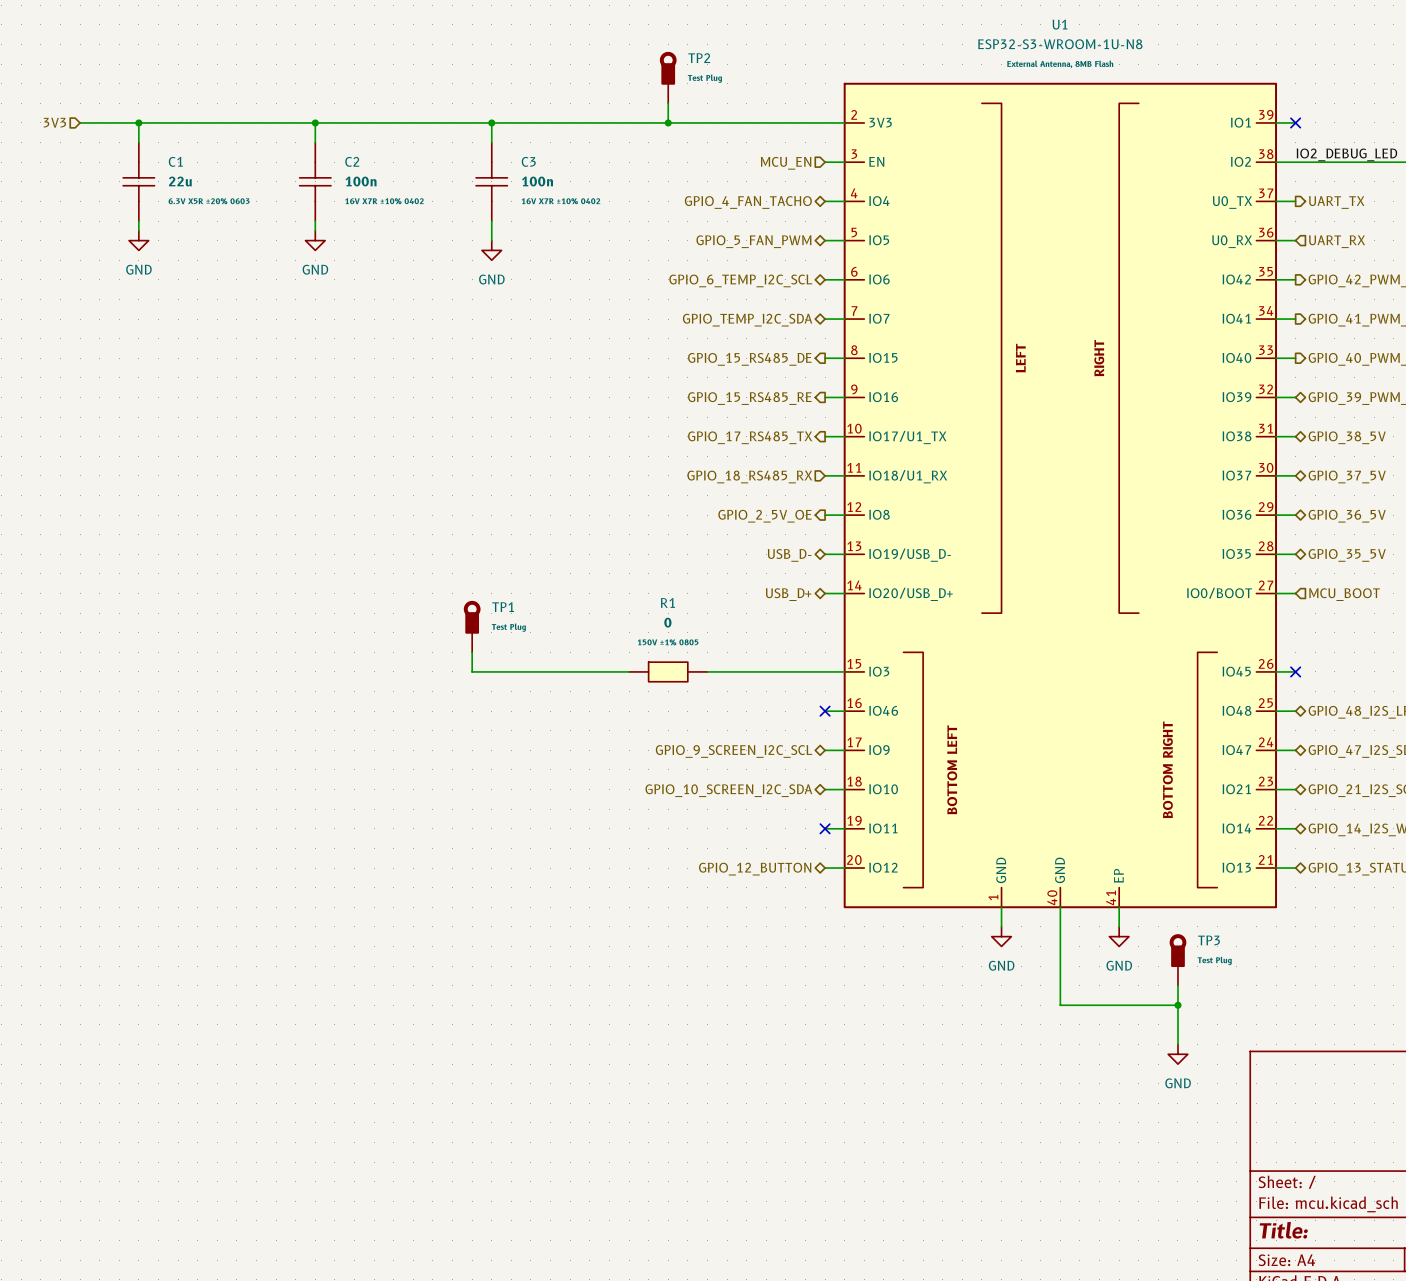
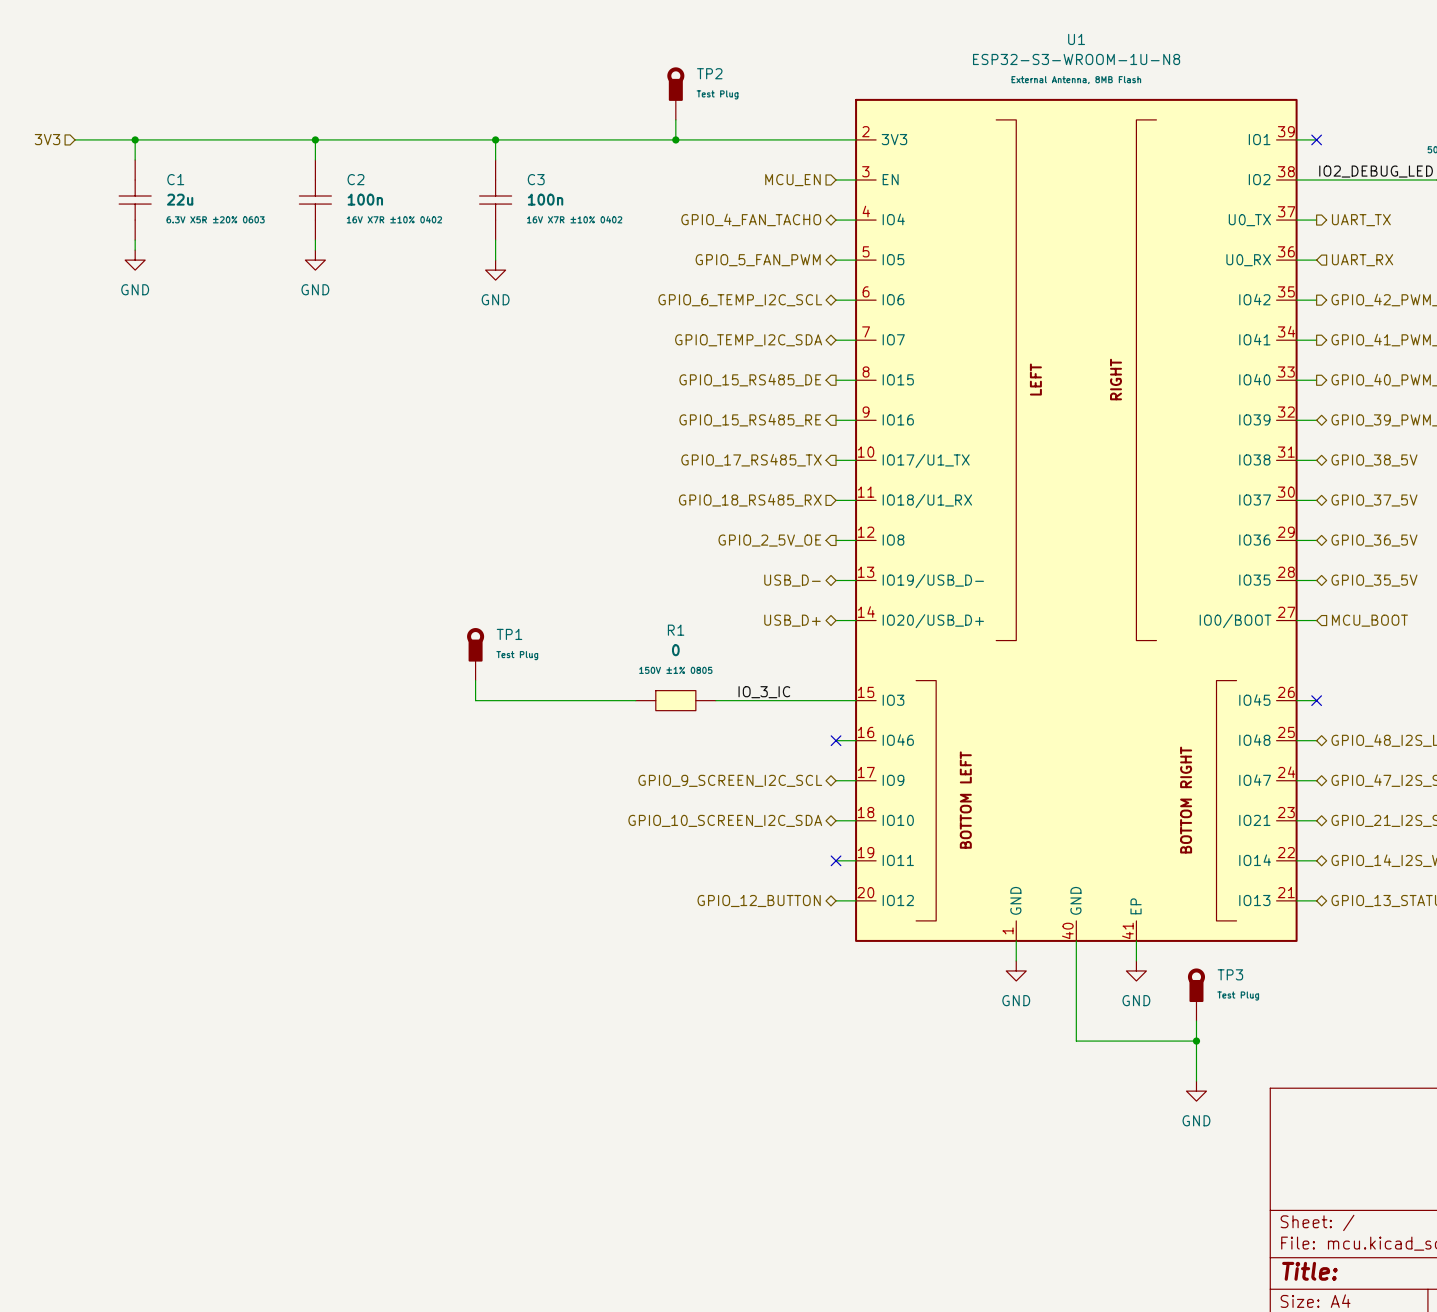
label: none -> IO_3_IC (764, 692)

